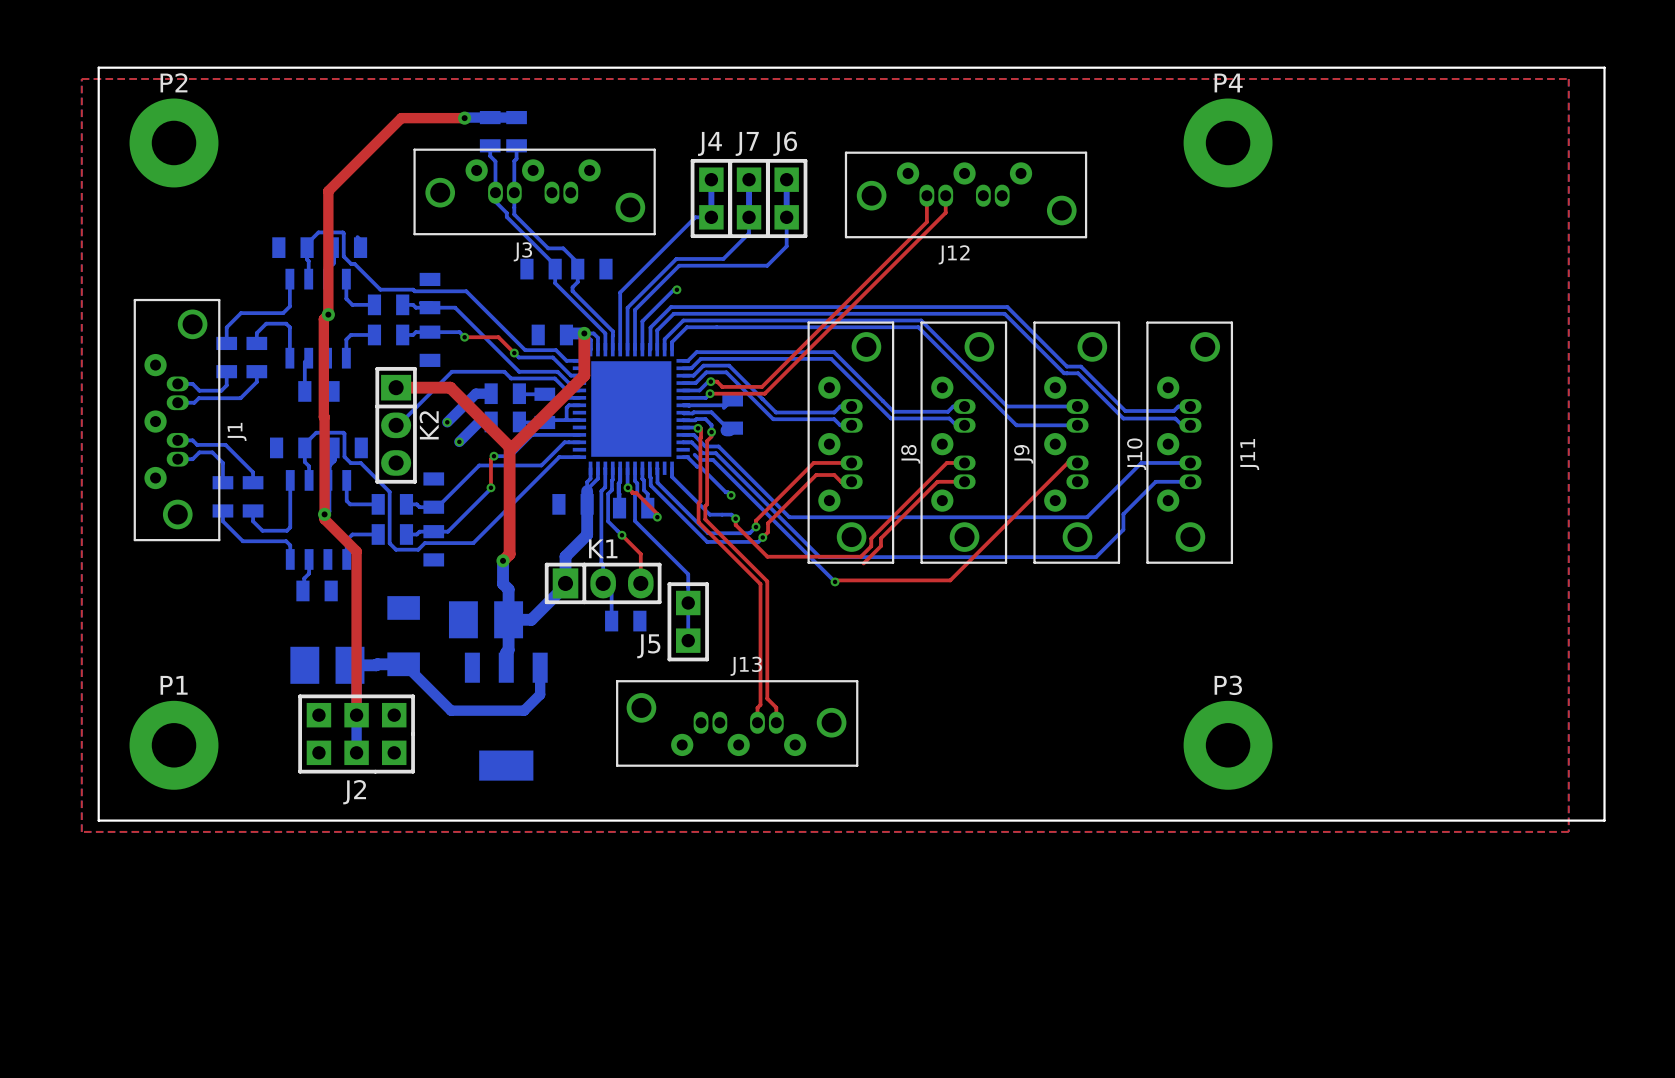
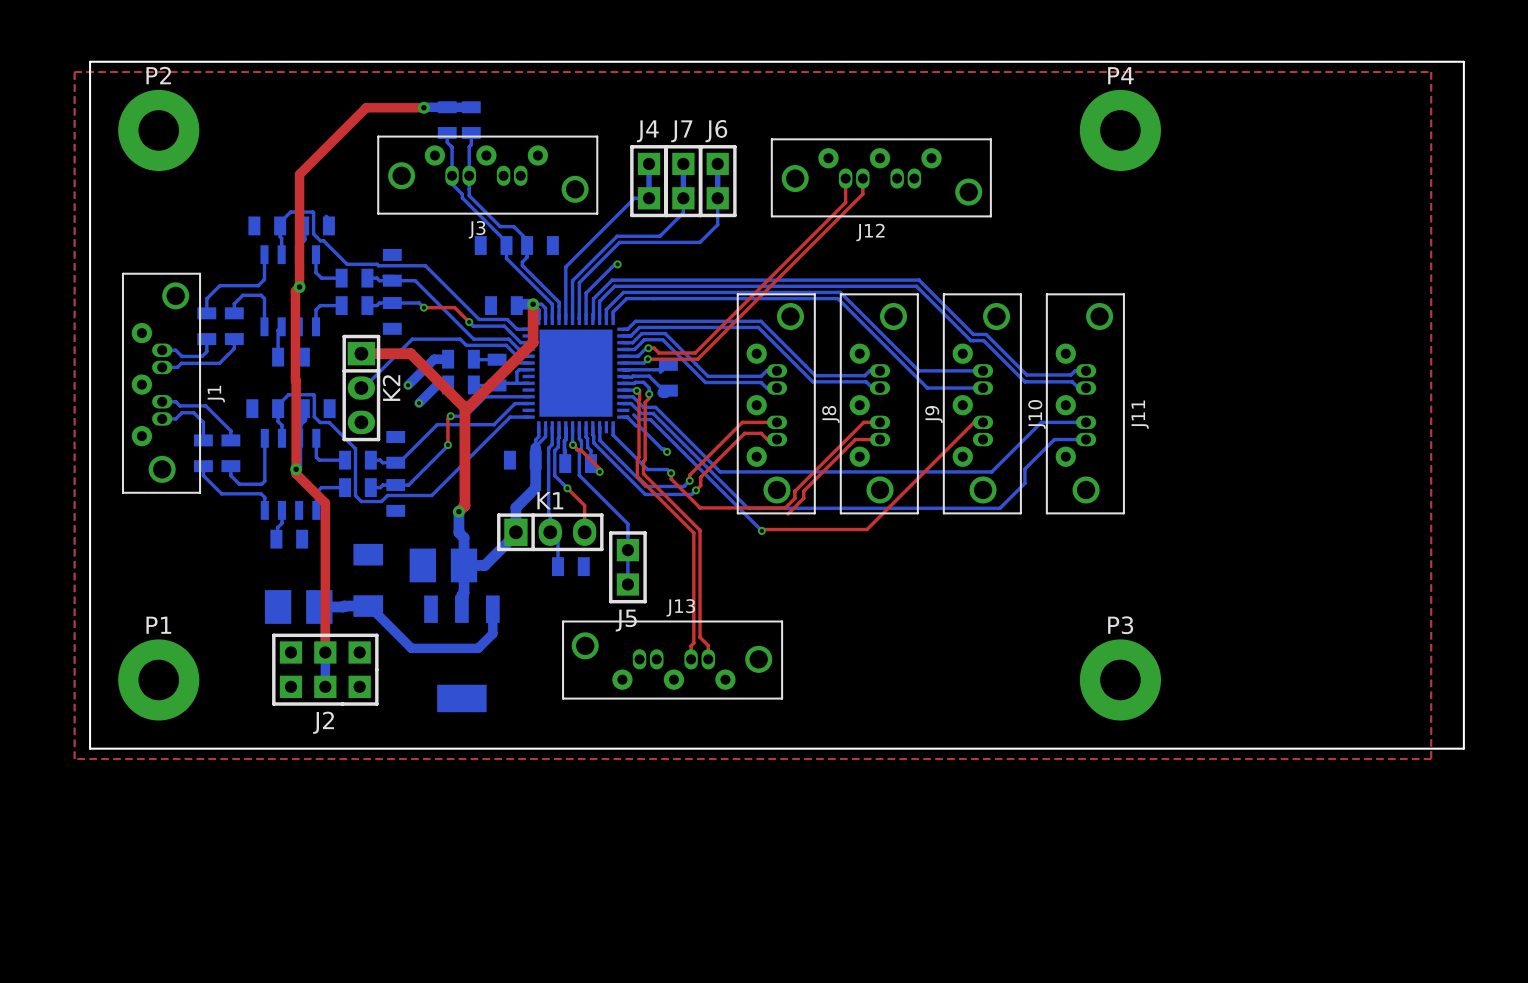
J5 name position: J5 (648, 646) -> J5 (626, 620)

